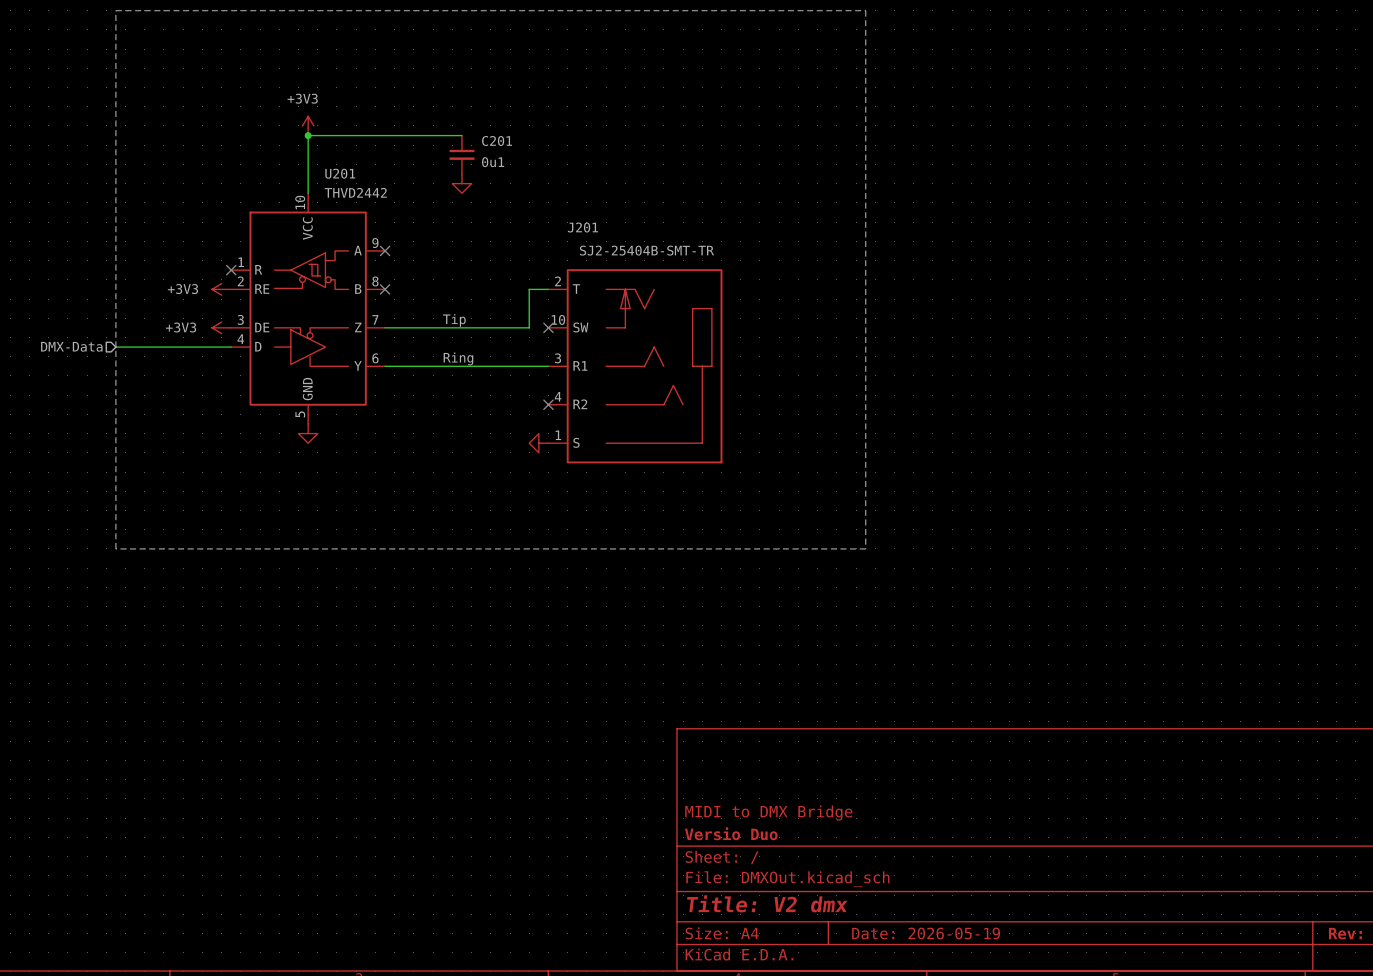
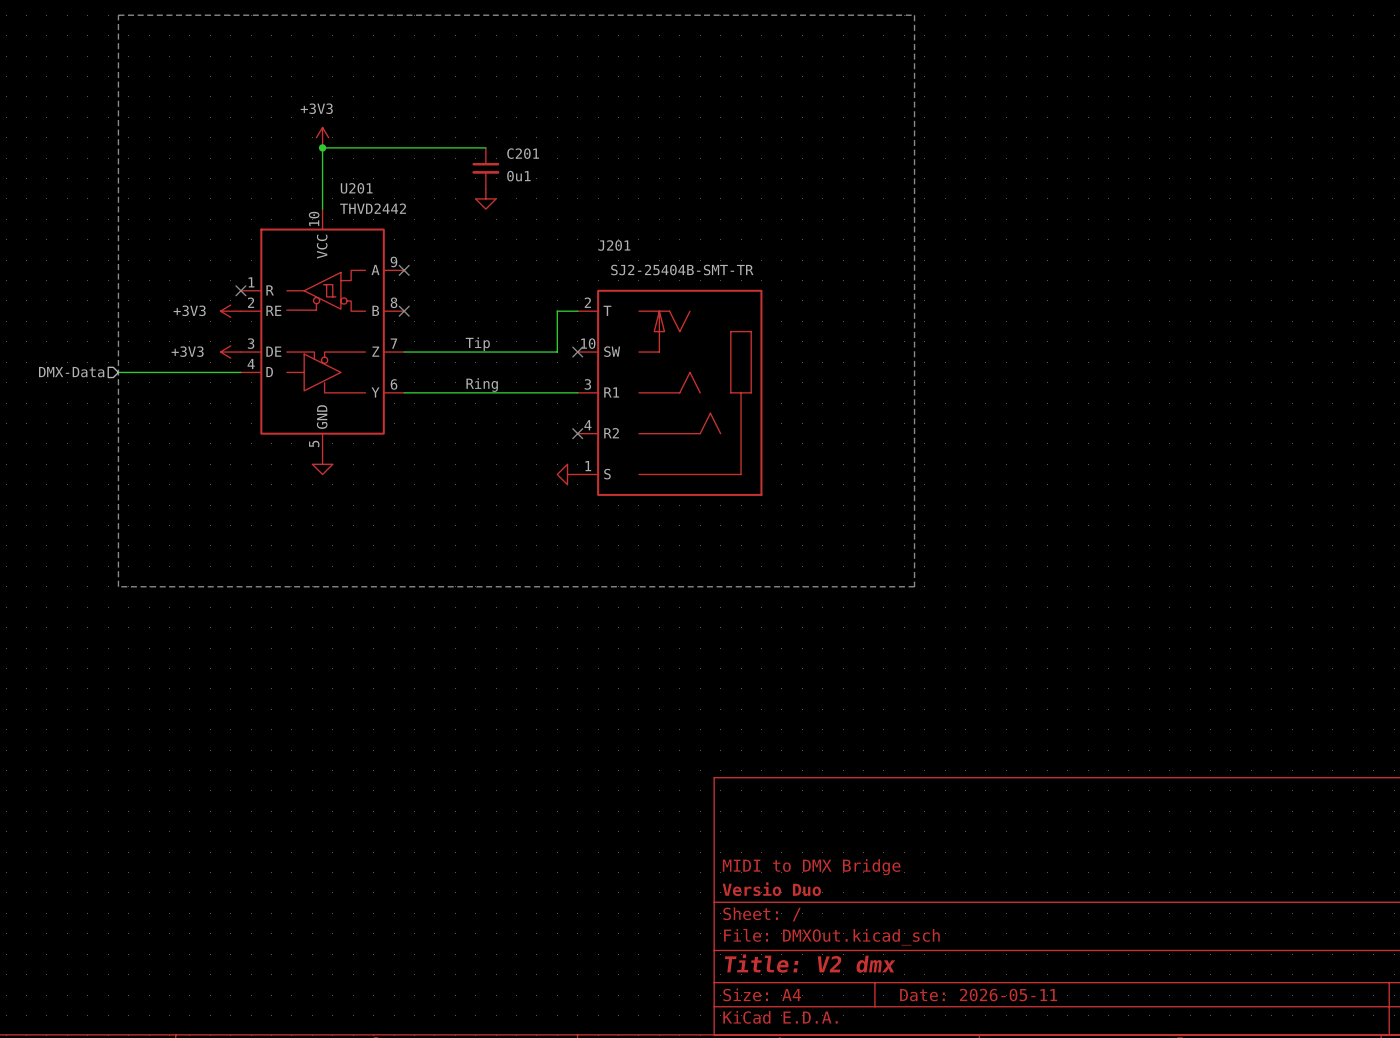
title block: Date: 2026-05-19 (926, 933) -> Date: 2026-05-11 (978, 995)

